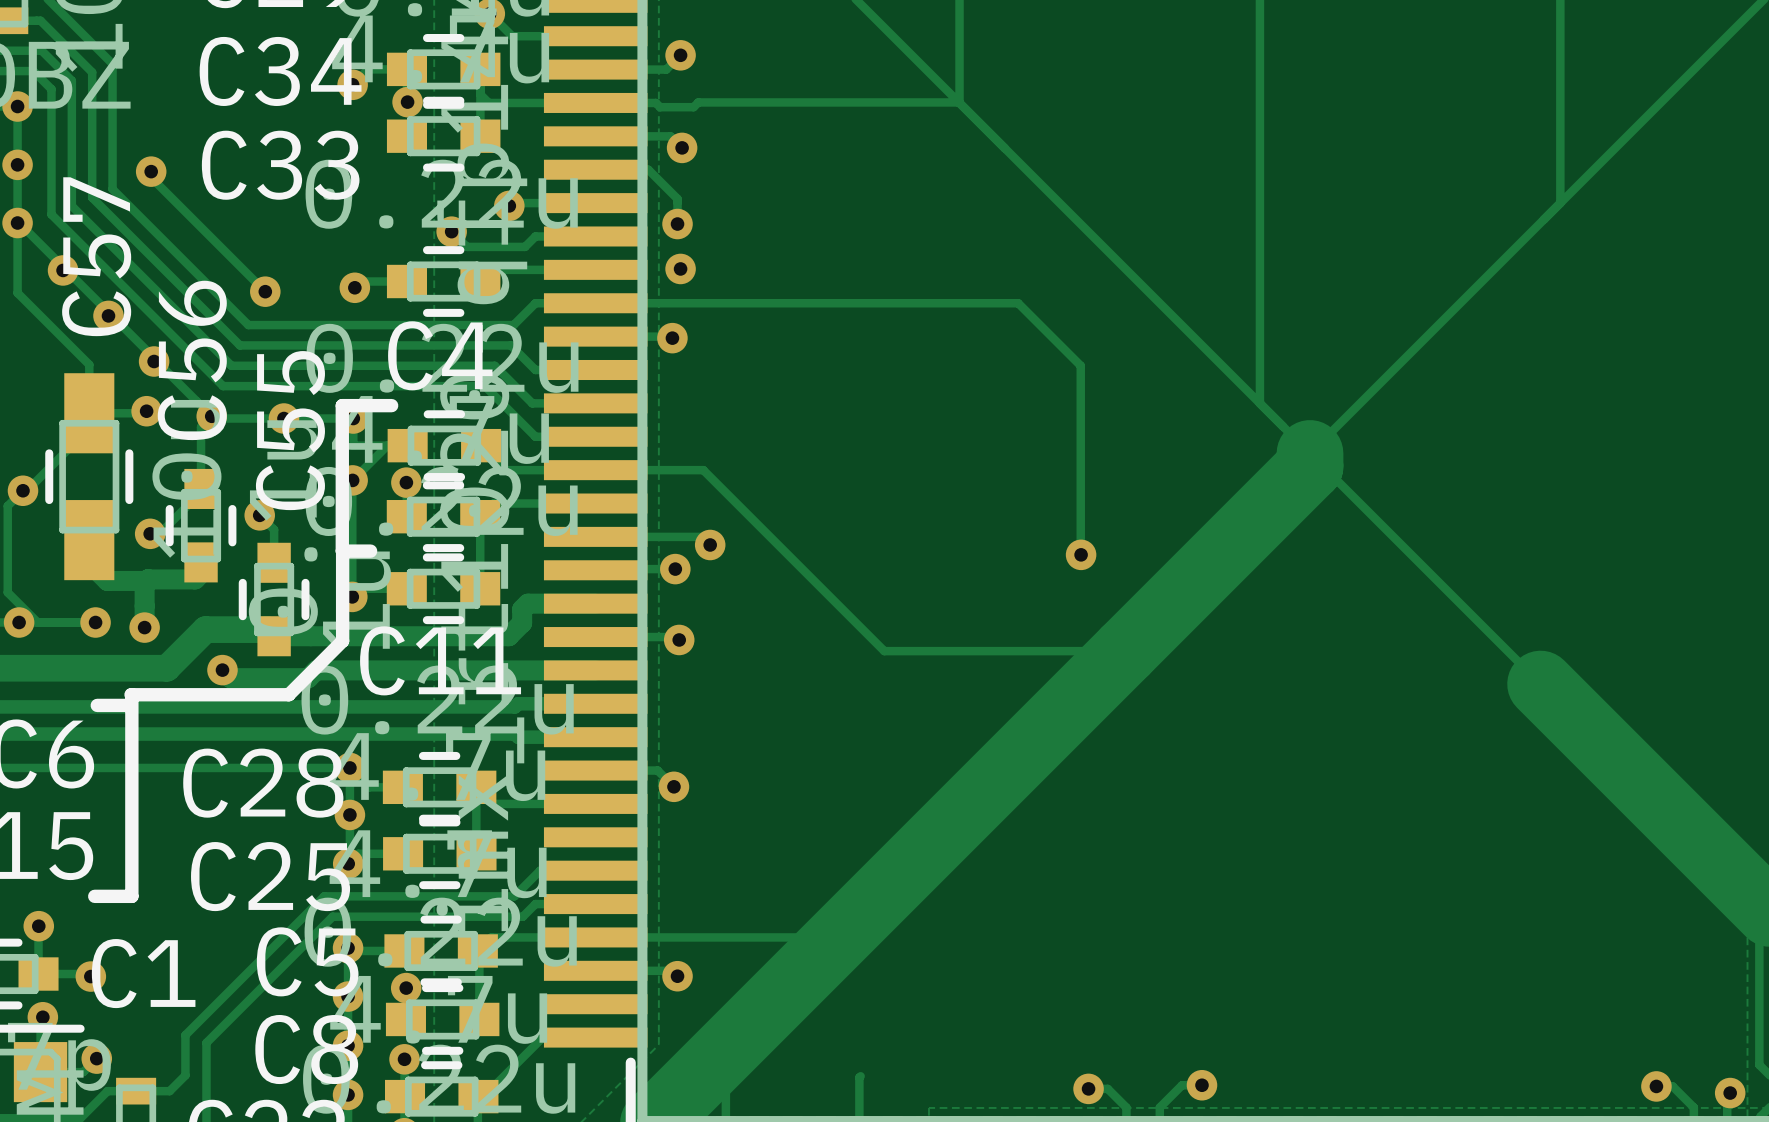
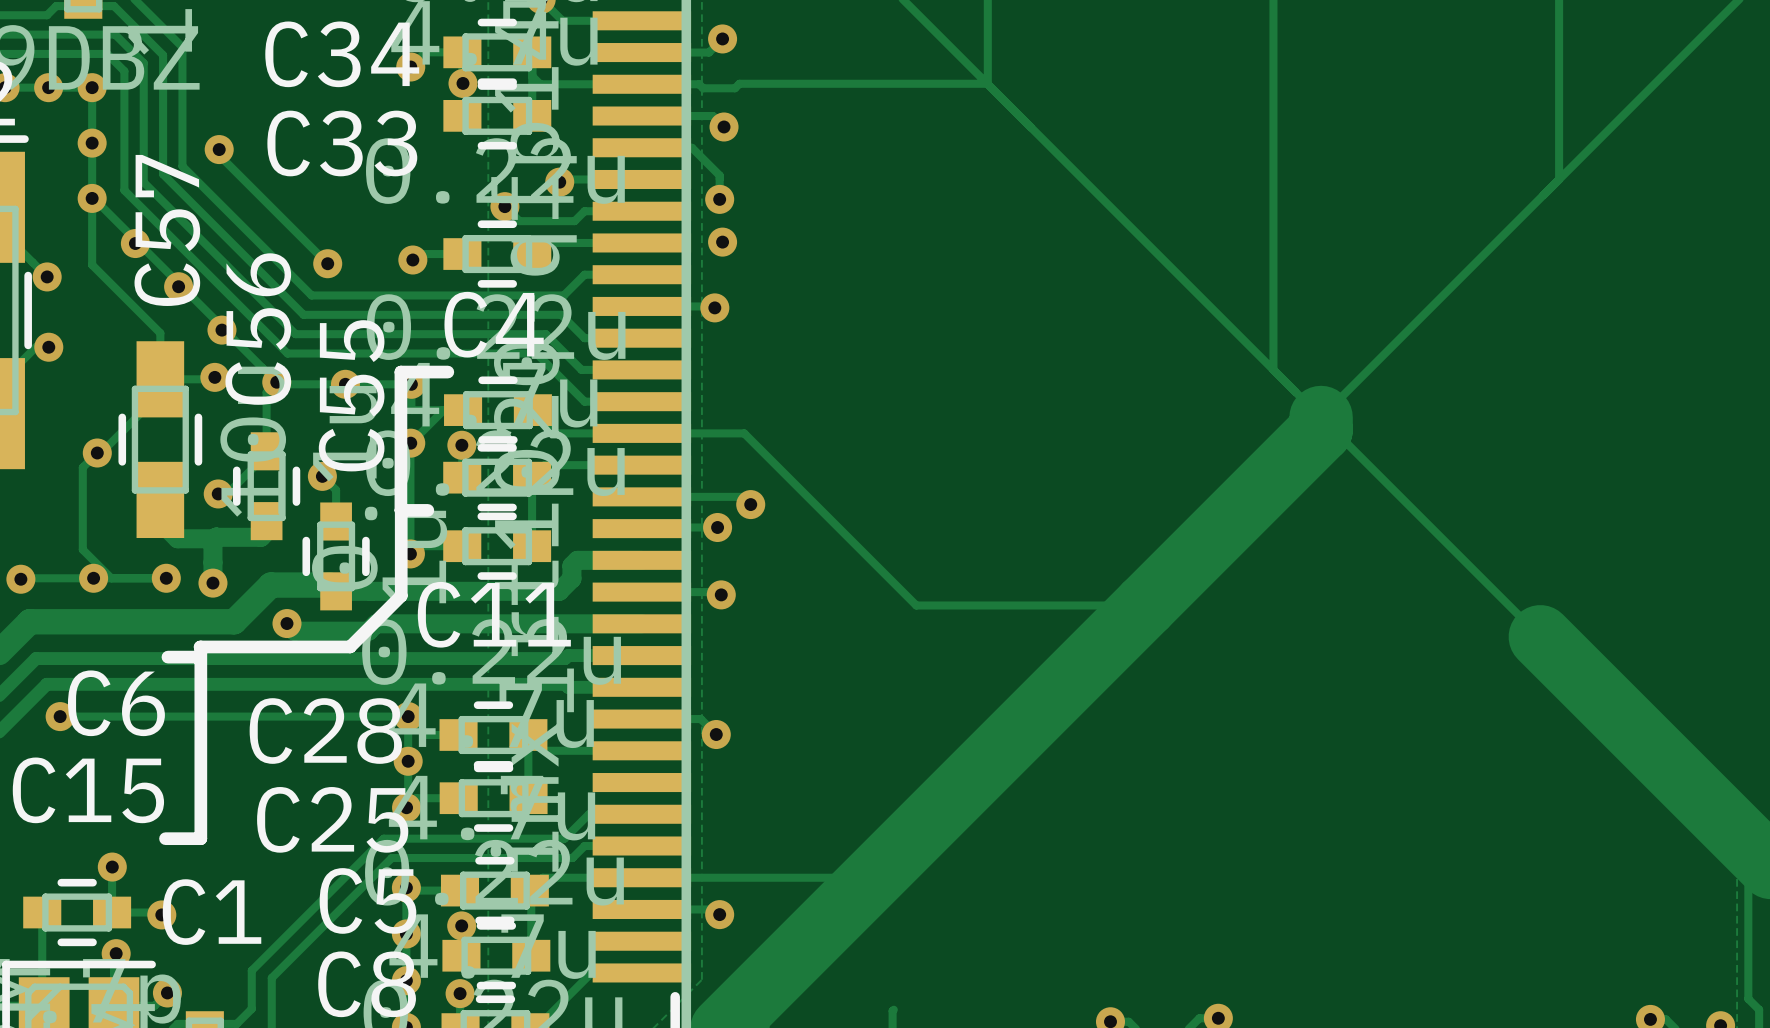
track: (595, 303) (1018, 303) (1080, 365) (1080, 554) -> none
via: (1081, 554) -> none

